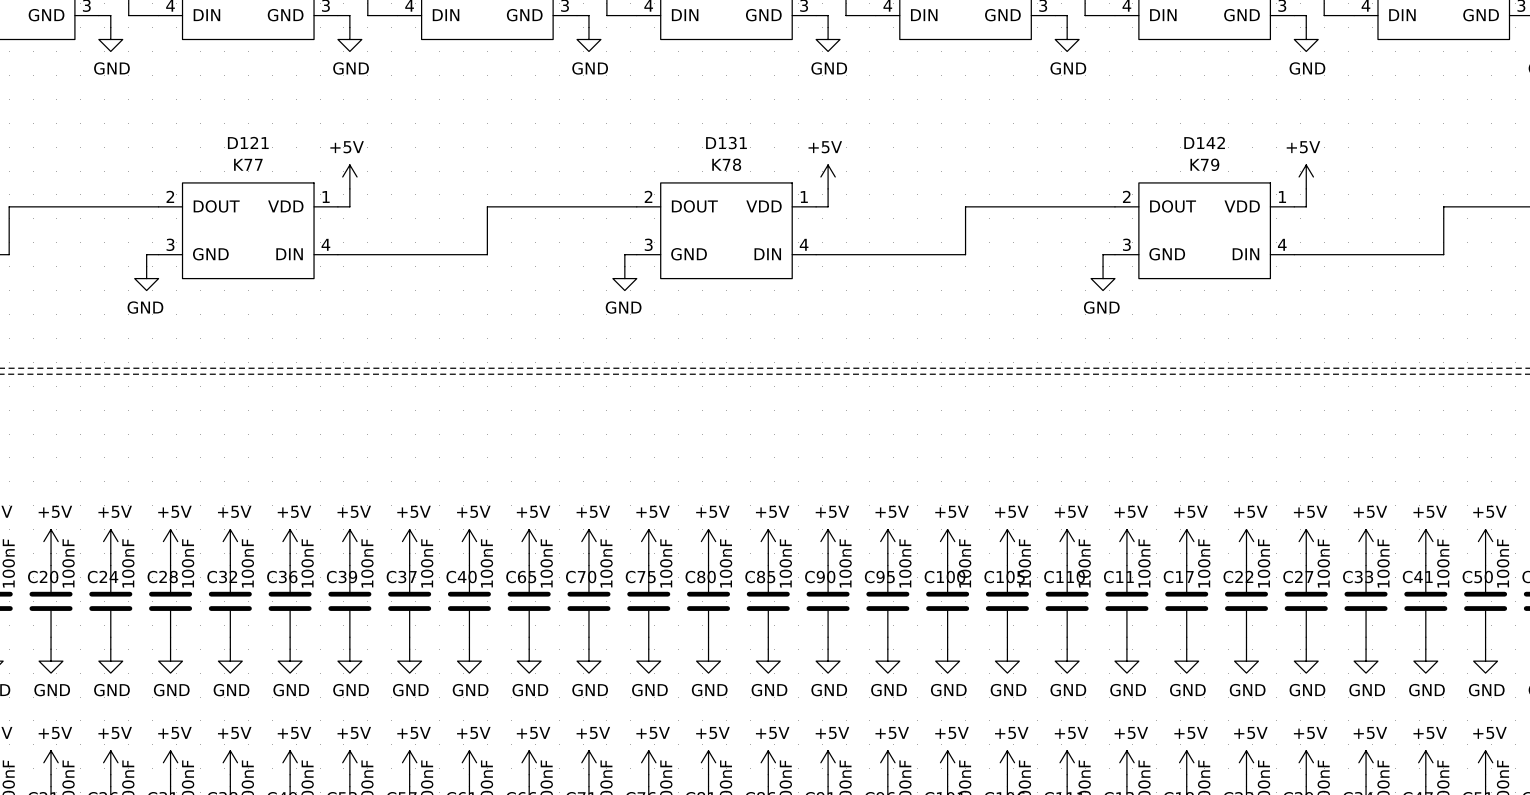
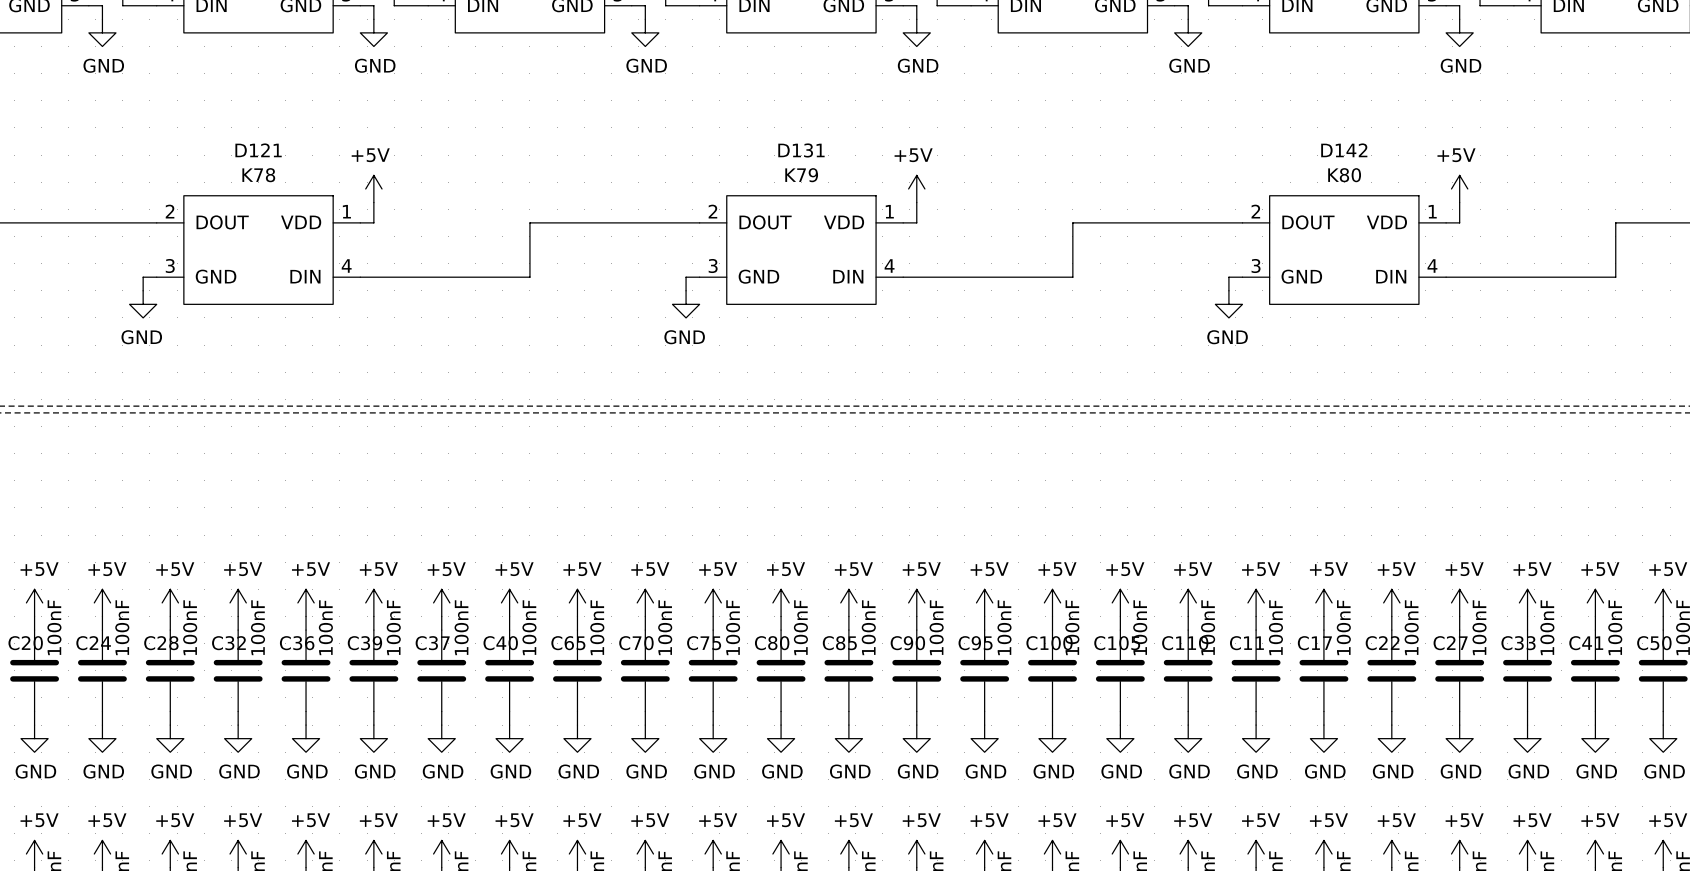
D121 value: K77 (248, 164) -> K78 (258, 175)
D131 value: K78 (726, 164) -> K79 (801, 175)
D142 value: K79 (1204, 164) -> K80 (1344, 175)

